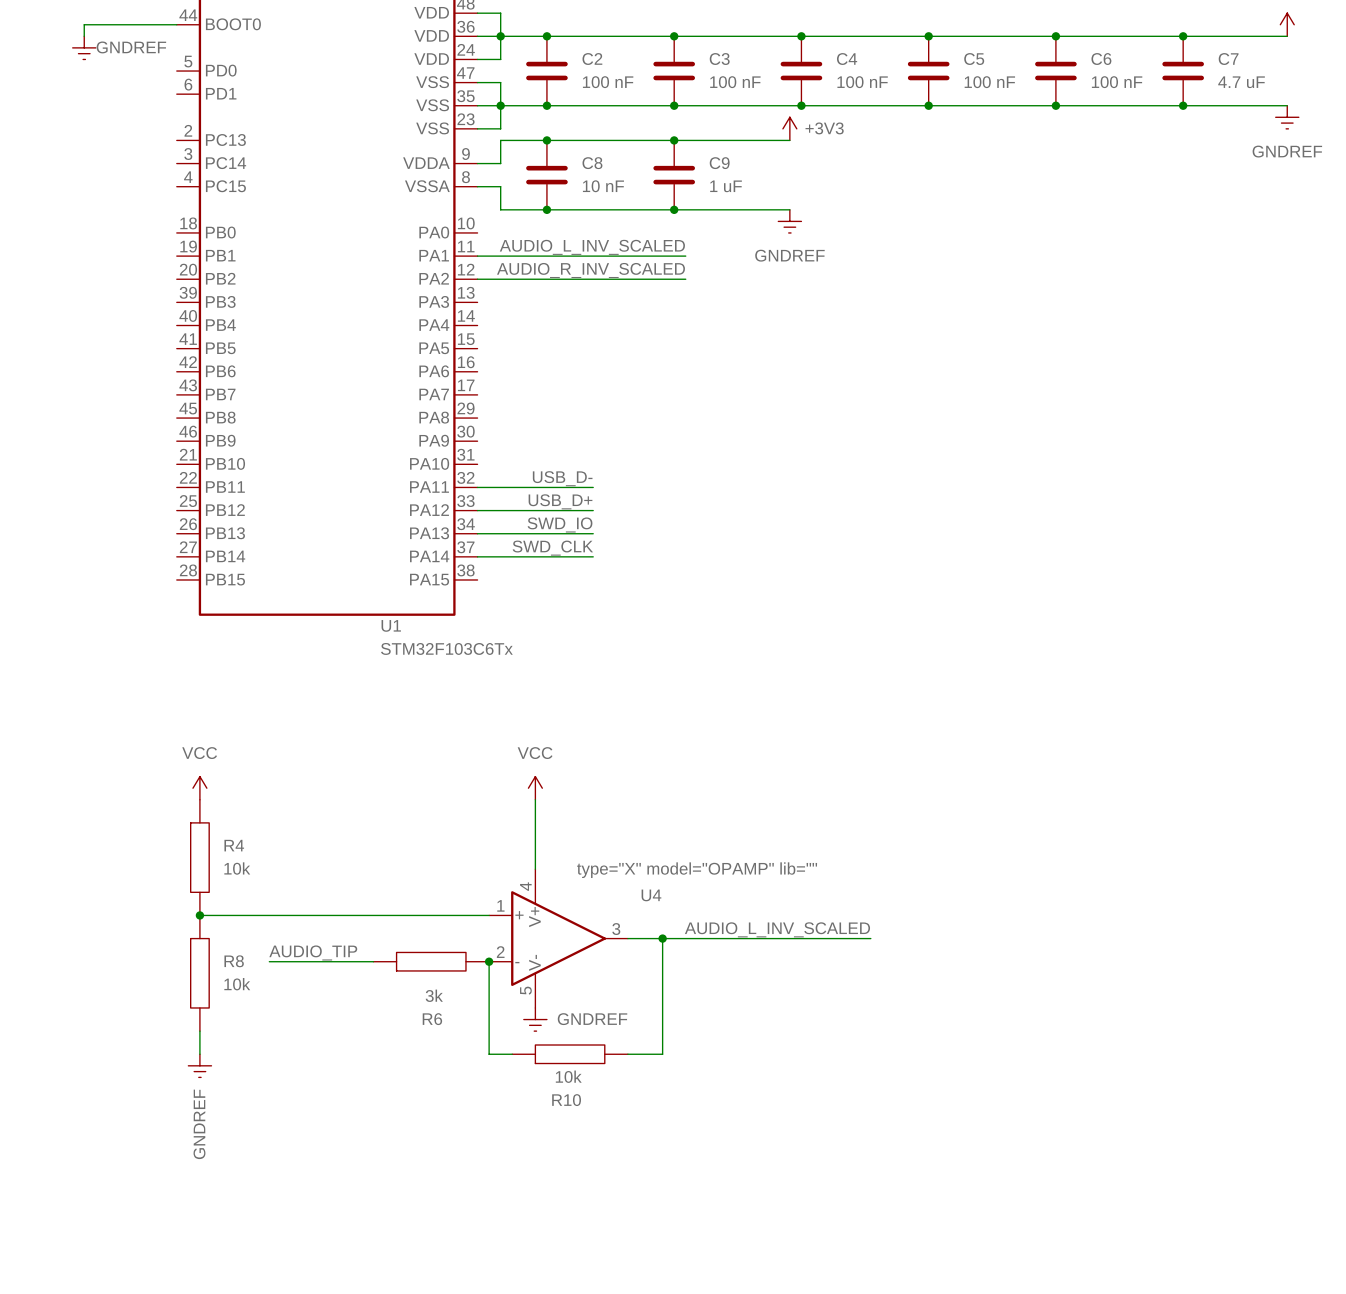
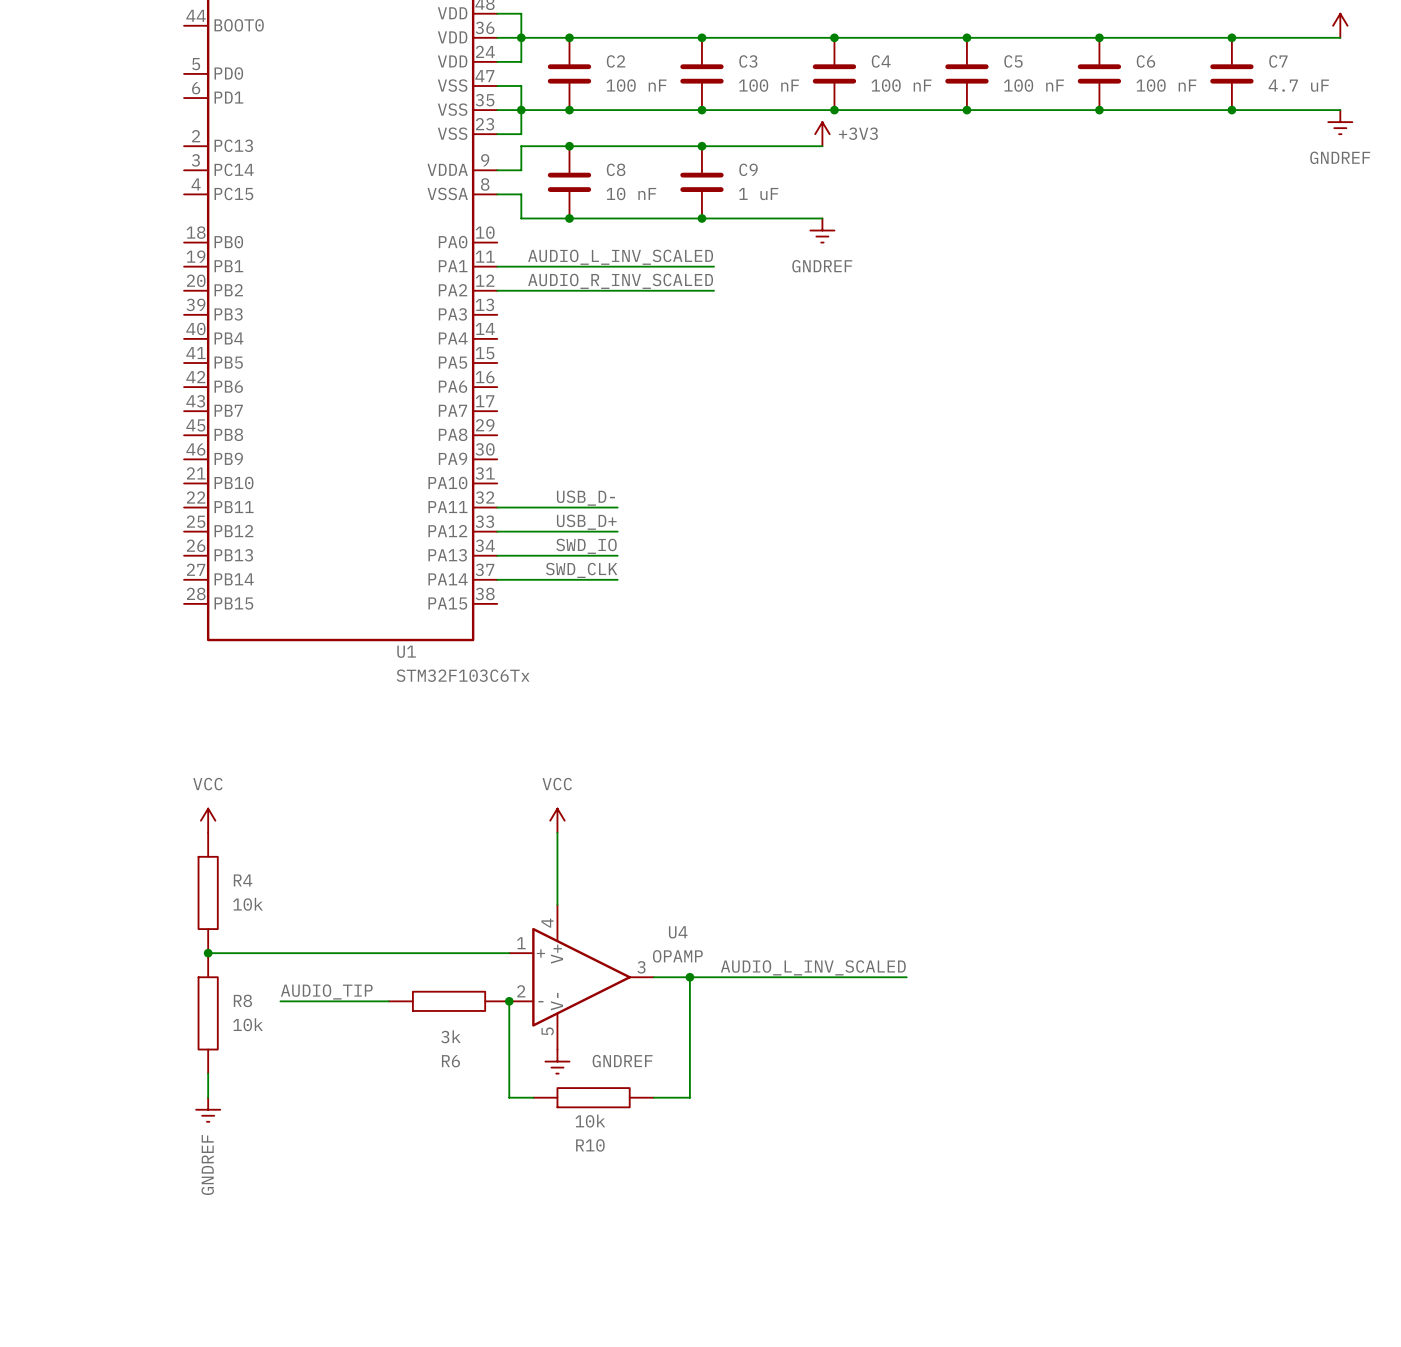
wire: (176, 24) (84, 24) (84, 36) -> none
power symbol: GNDREF (84, 47) -> none
U4 value: type="X" model="OPAMP" lib="" (697, 870) -> OPAMP (677, 956)

